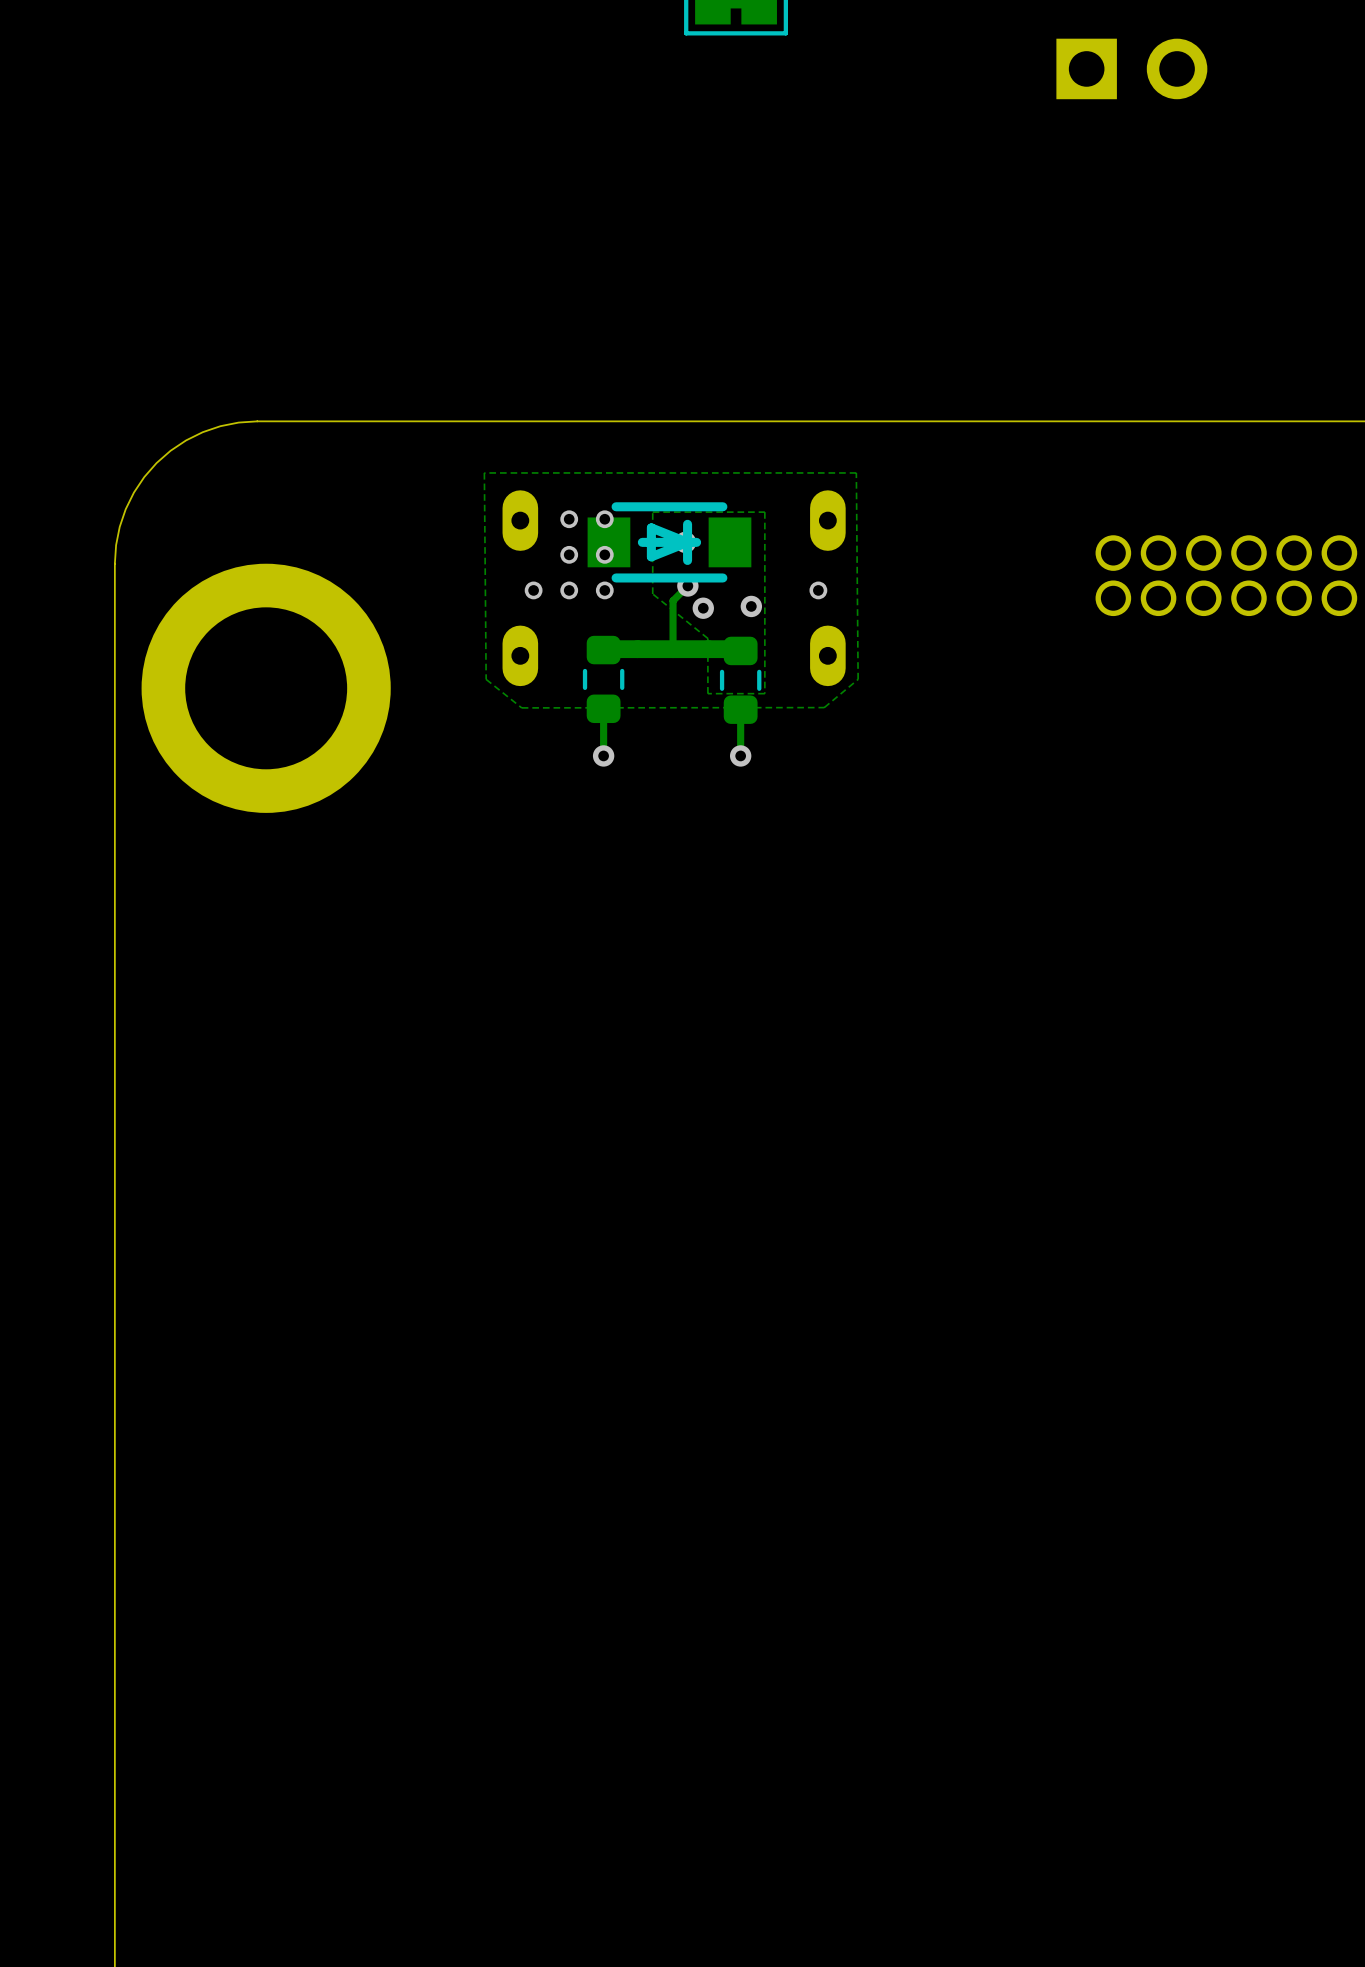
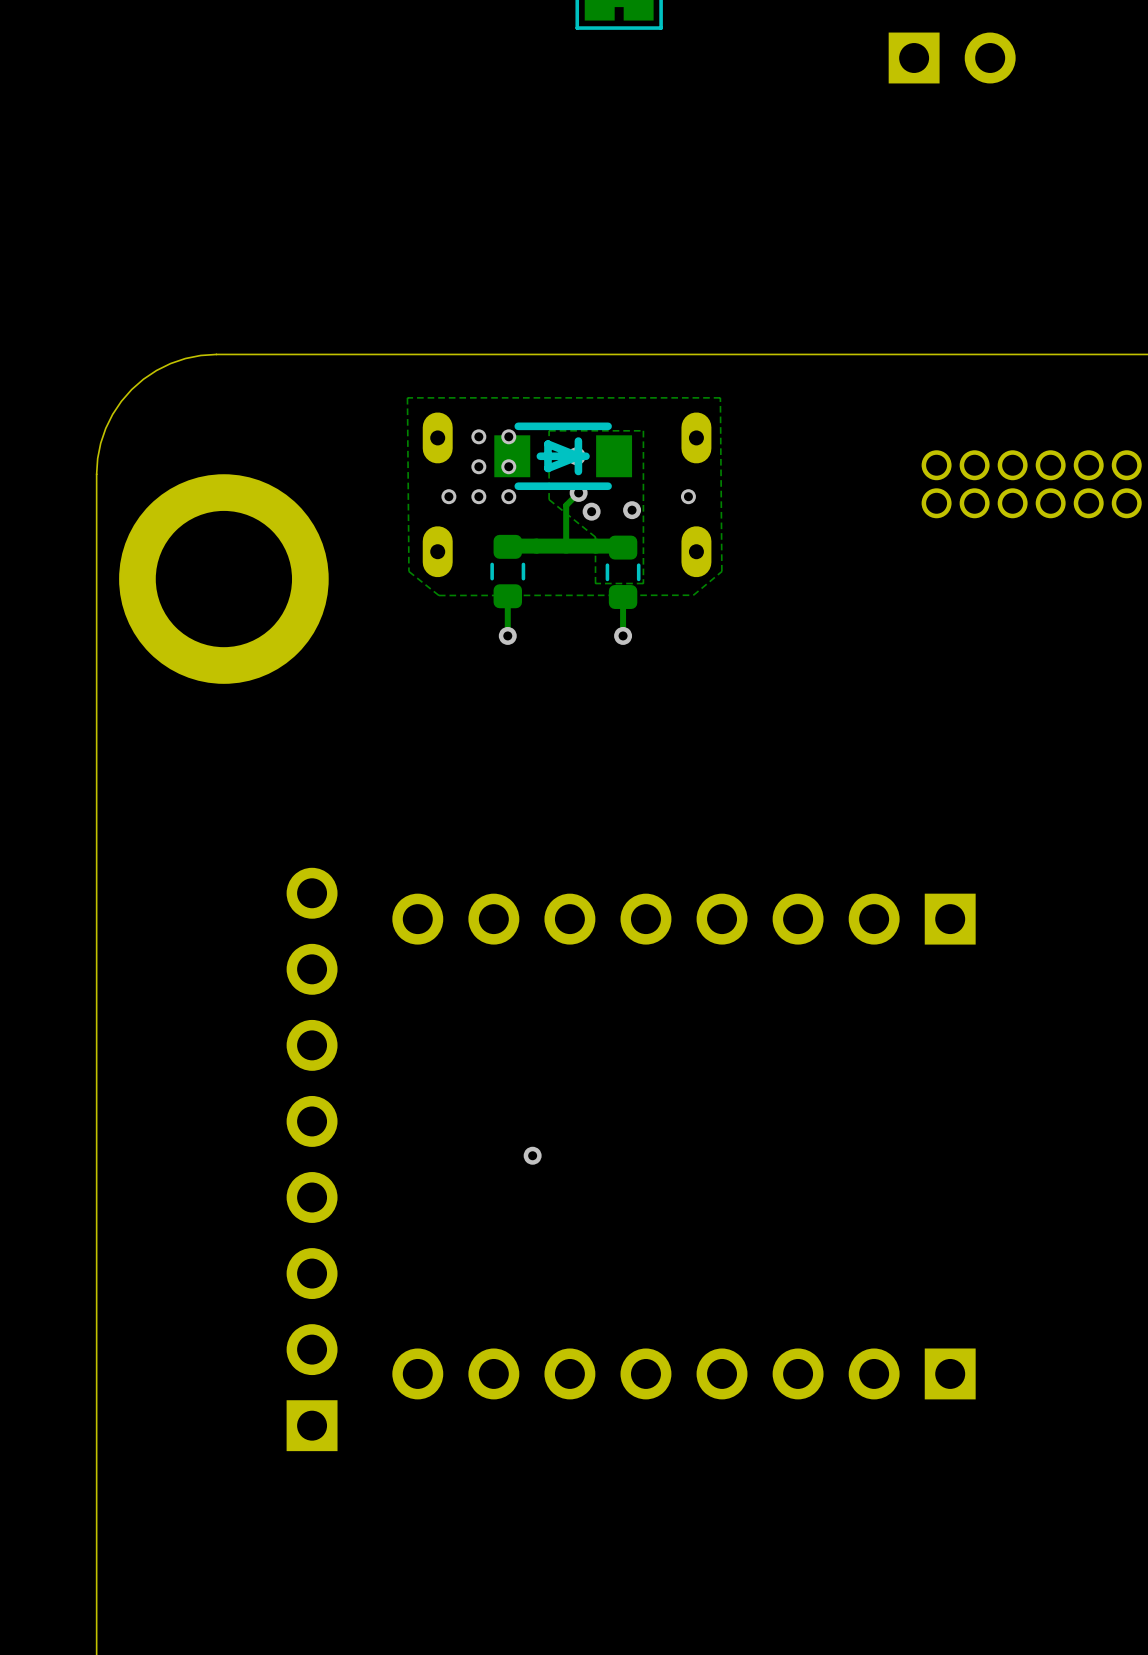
part: none -> (684, 919)
via: none -> (532, 1155)
part: none -> (312, 1159)
part: none -> (684, 1373)

